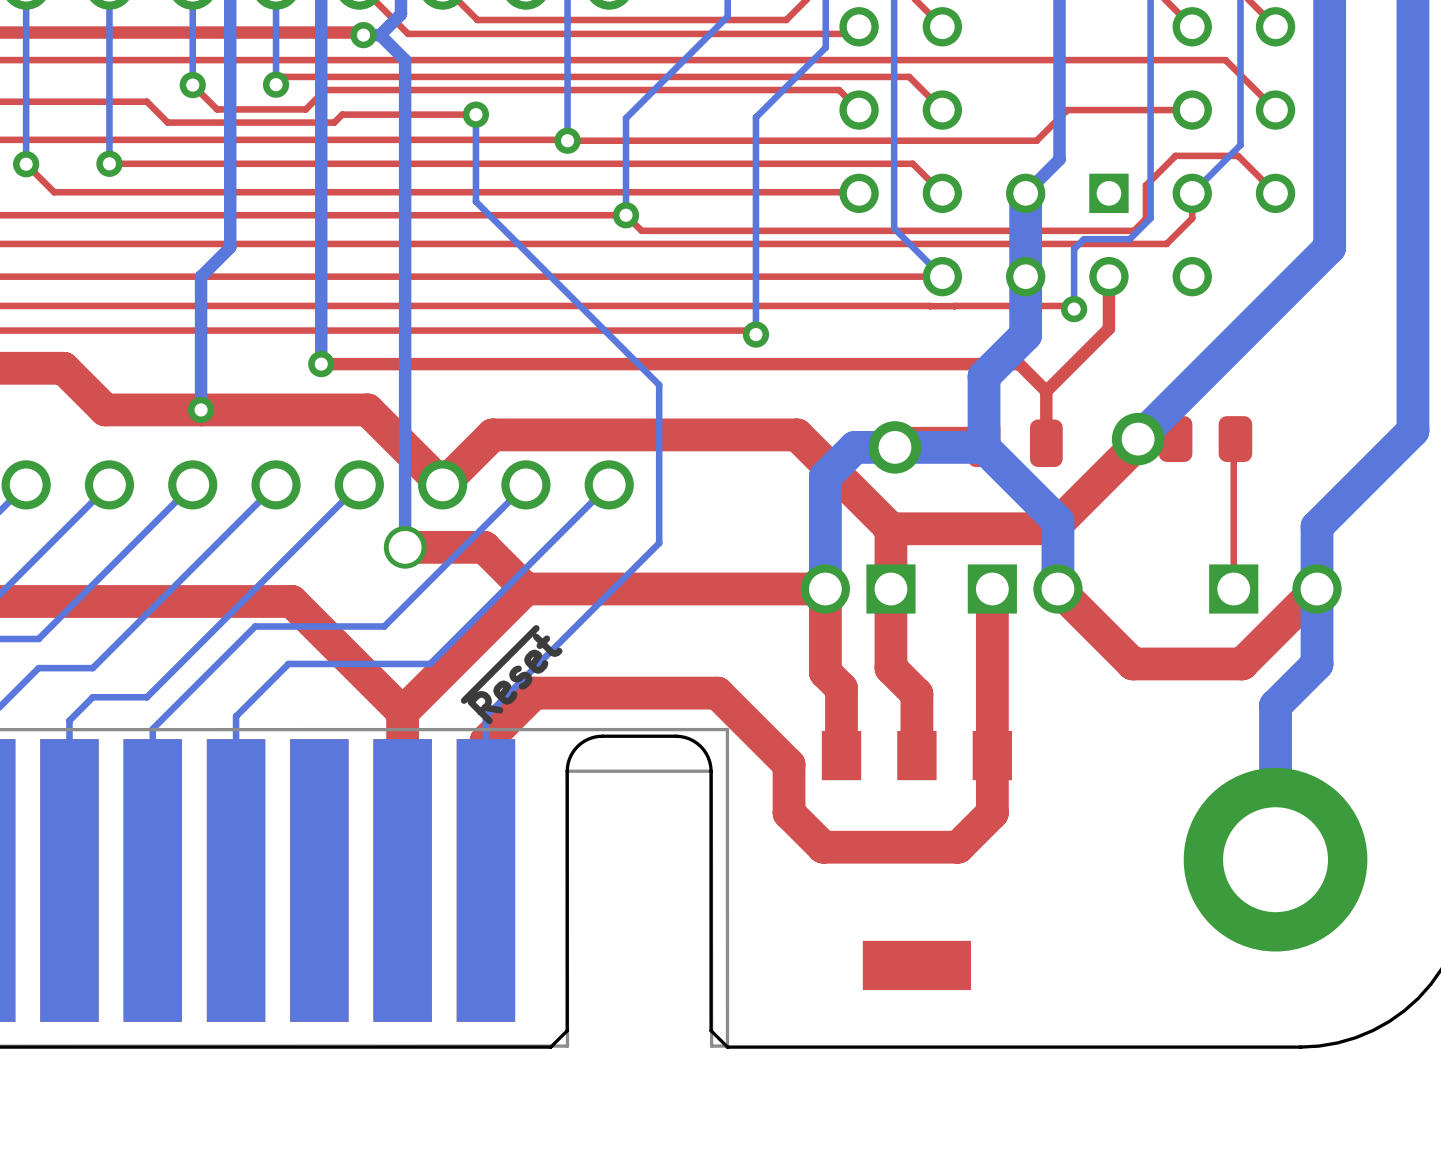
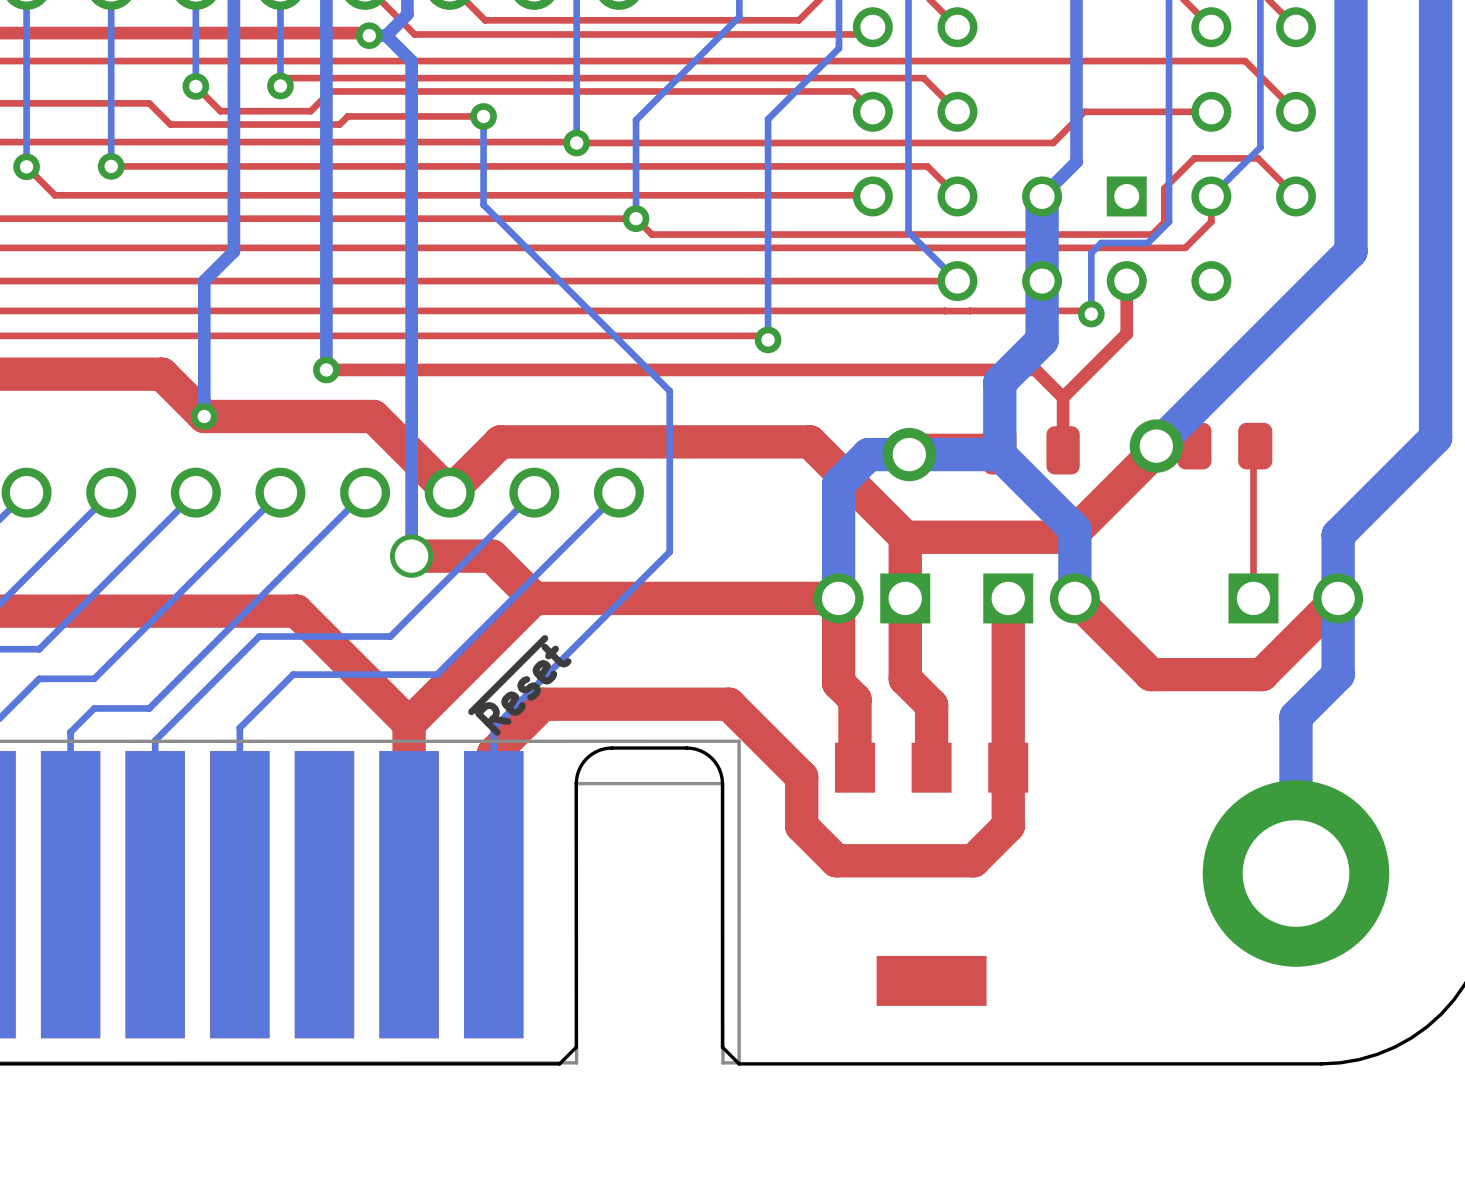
top track: (63, 368) (105, 409) (201, 409) -> (64, 374) (161, 374) (204, 416)

